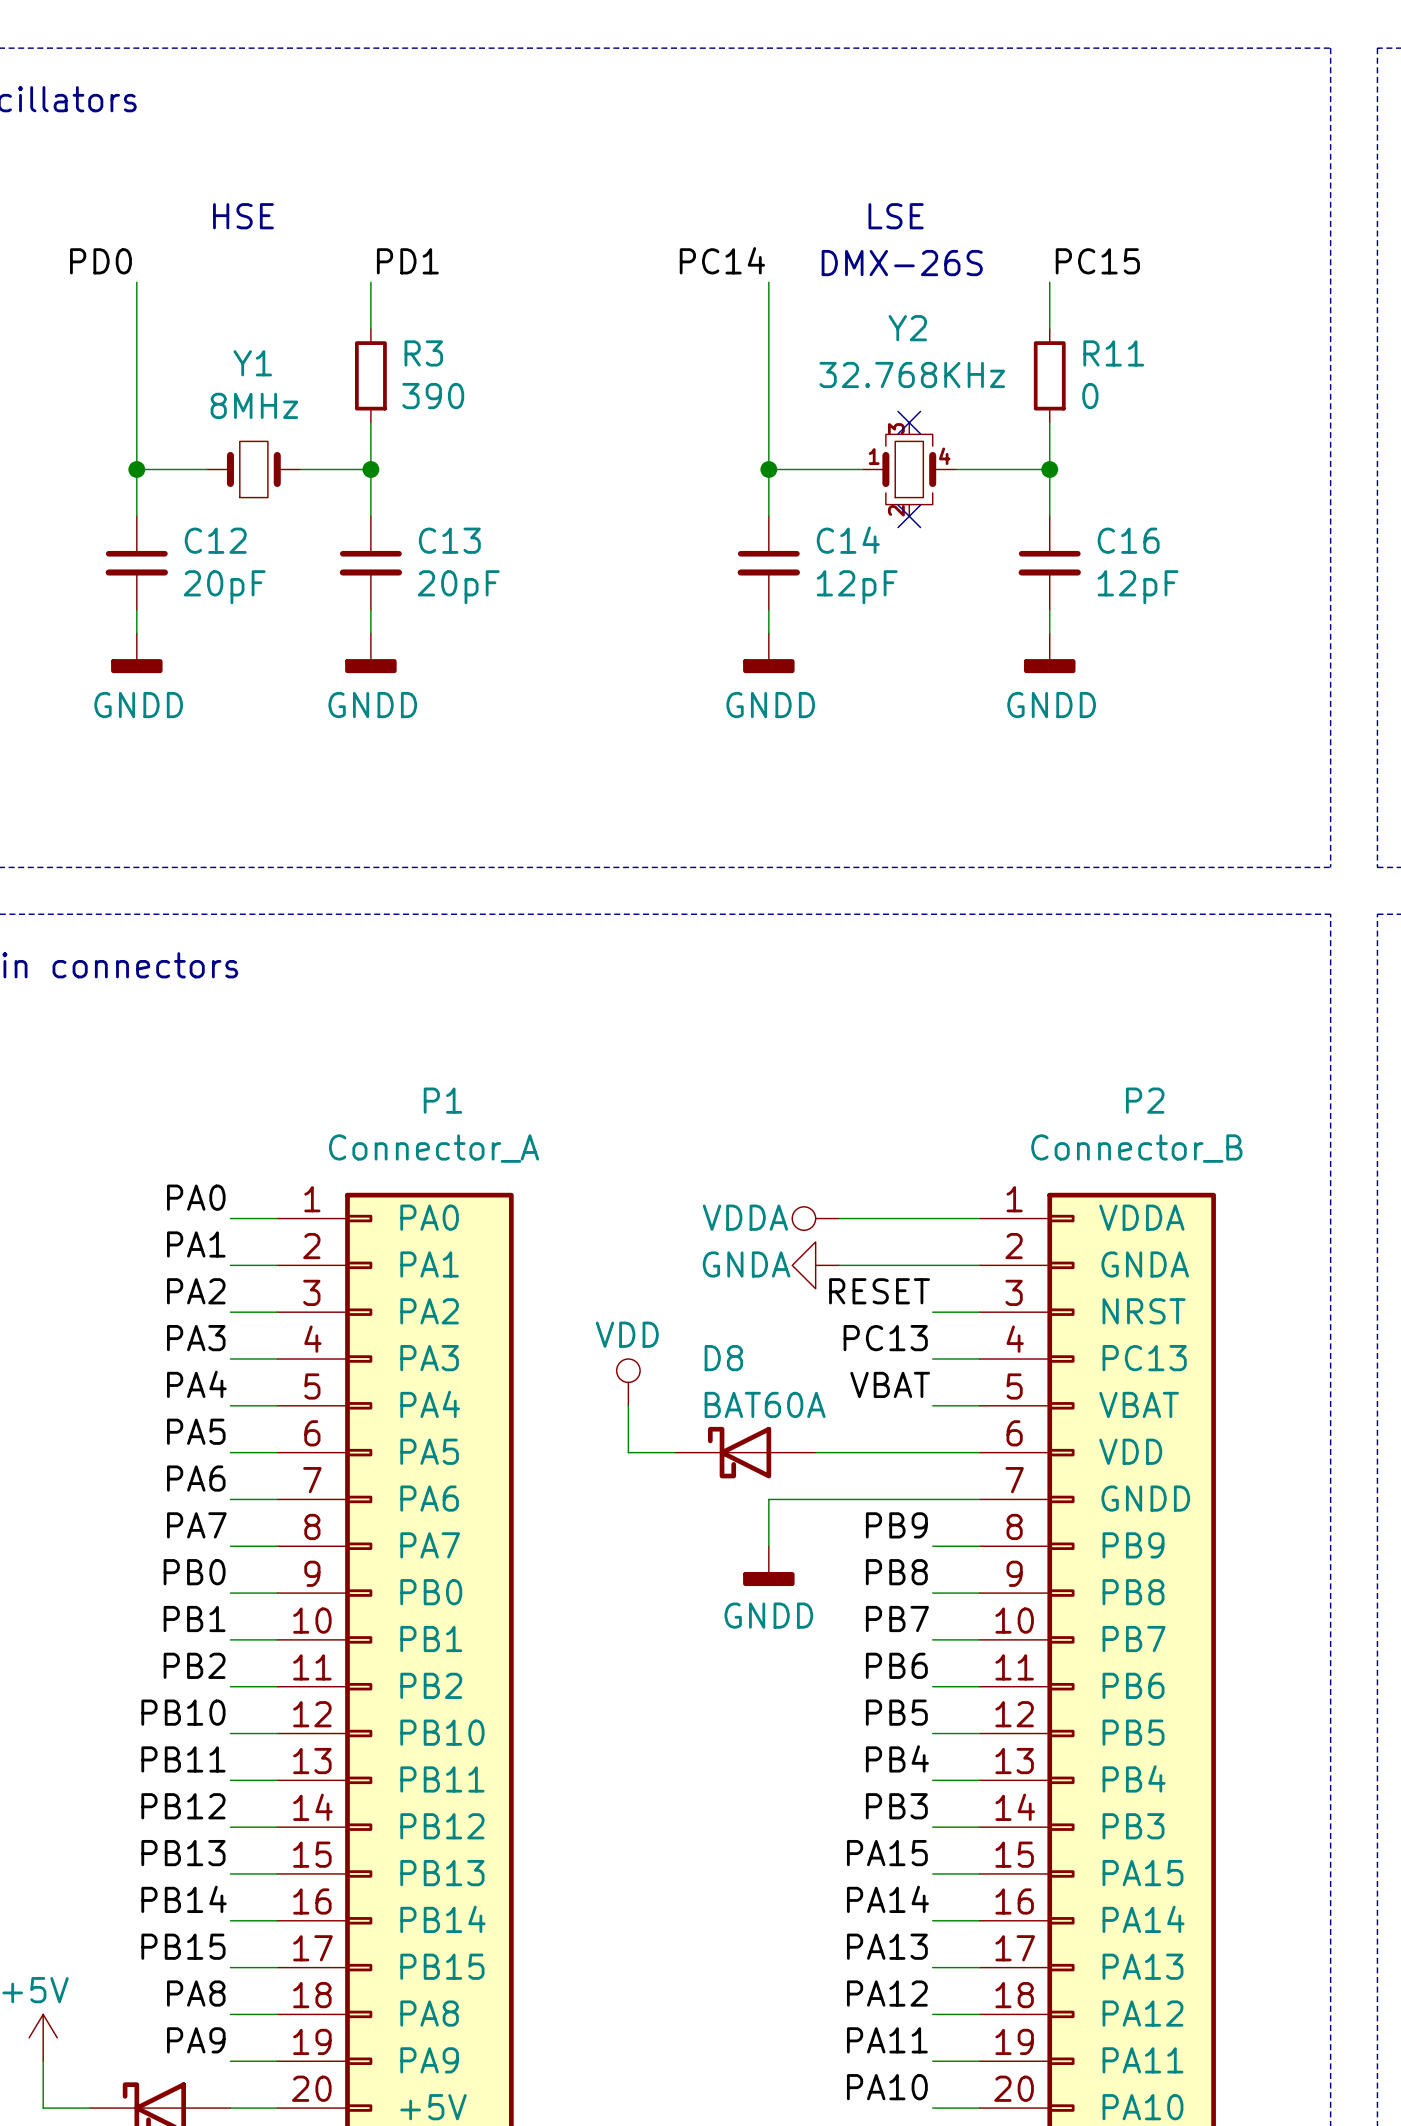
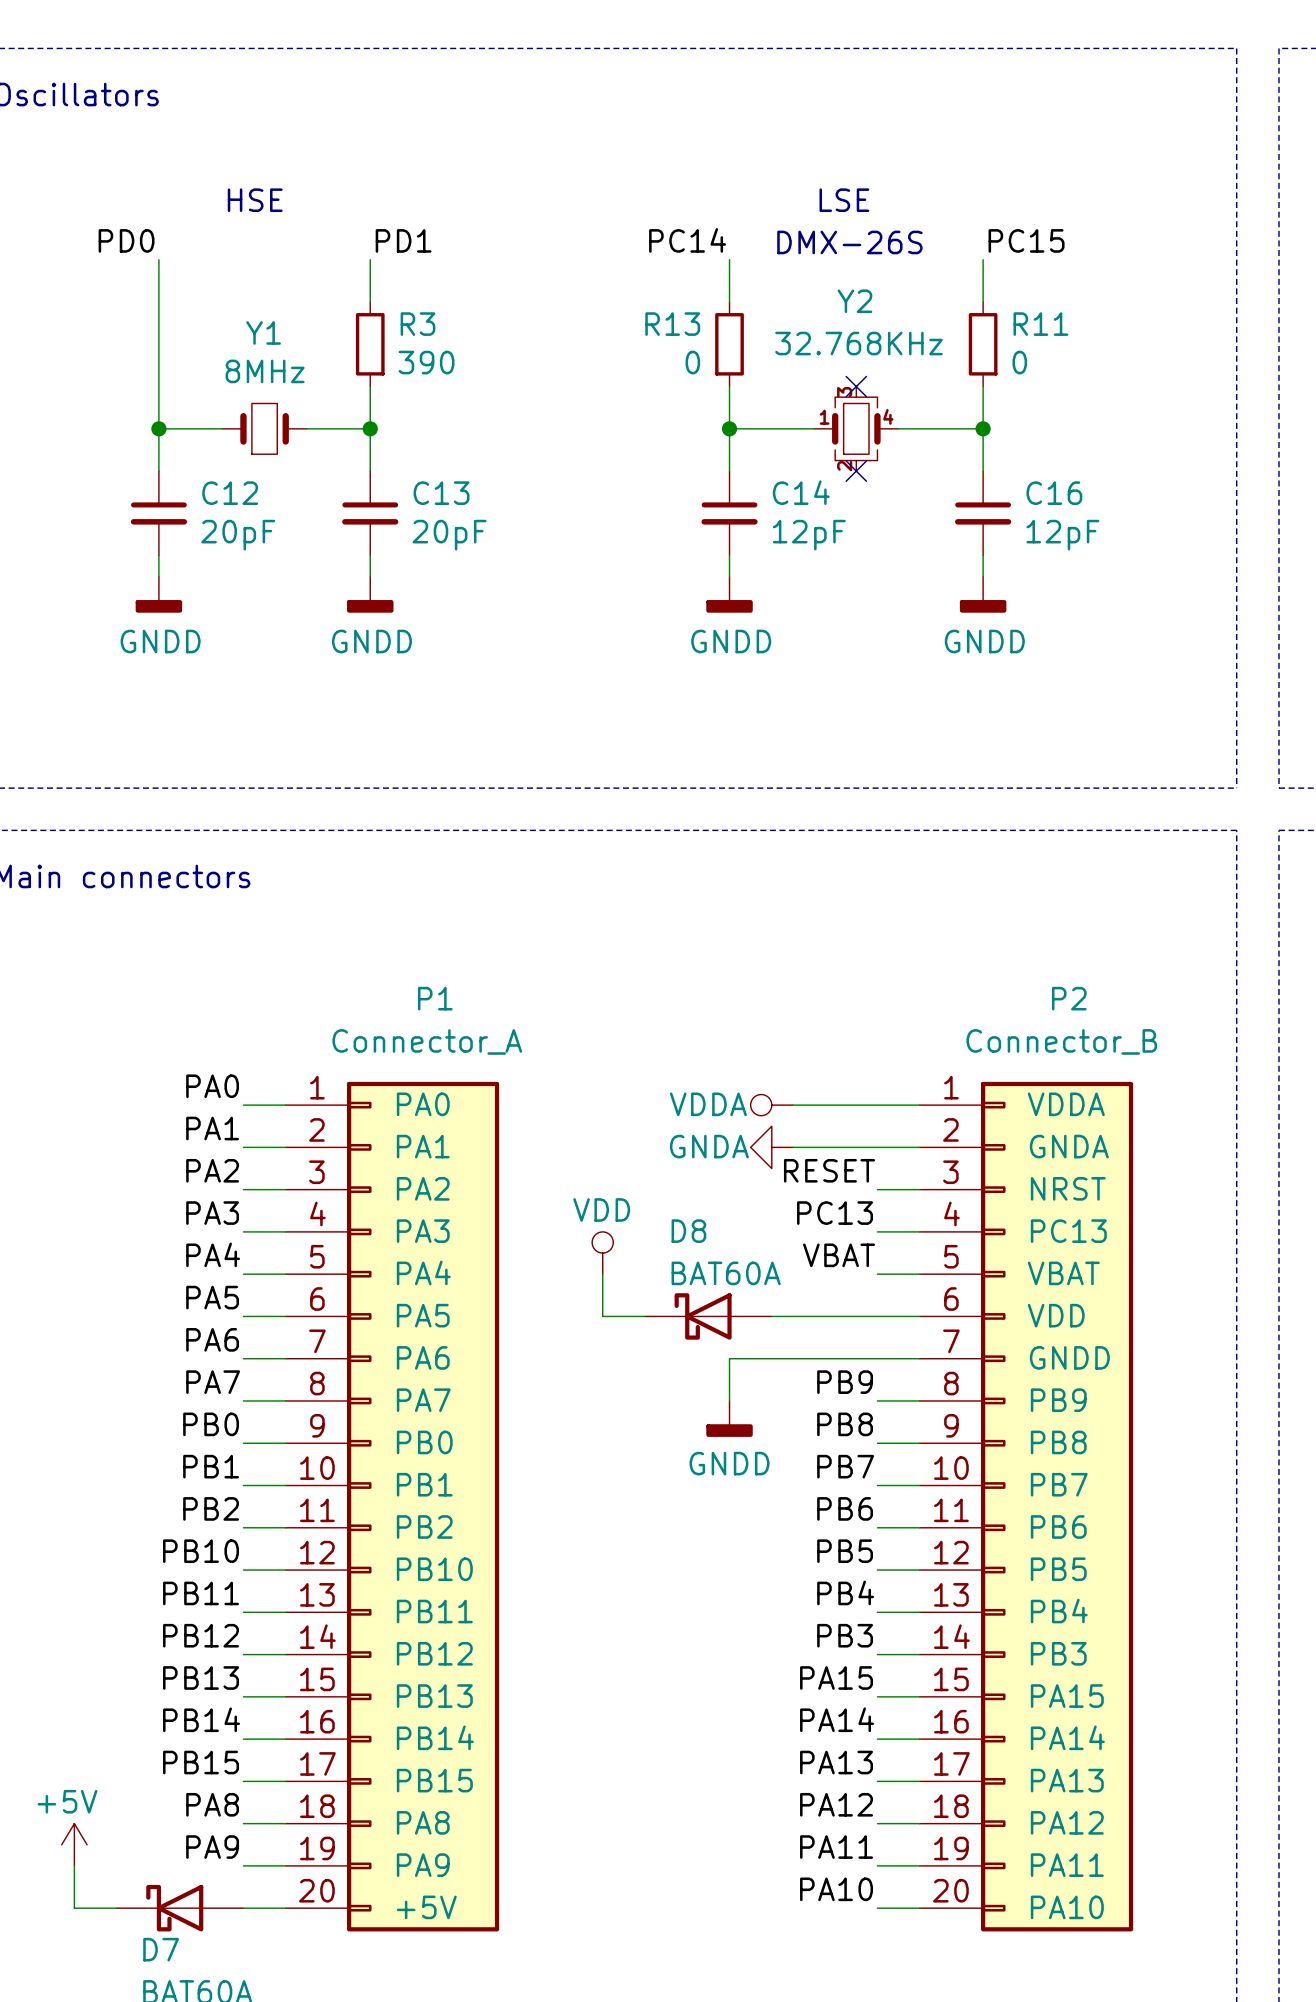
wire: (768, 329) (768, 422) -> none
R13: none -> 0 (729, 344)

